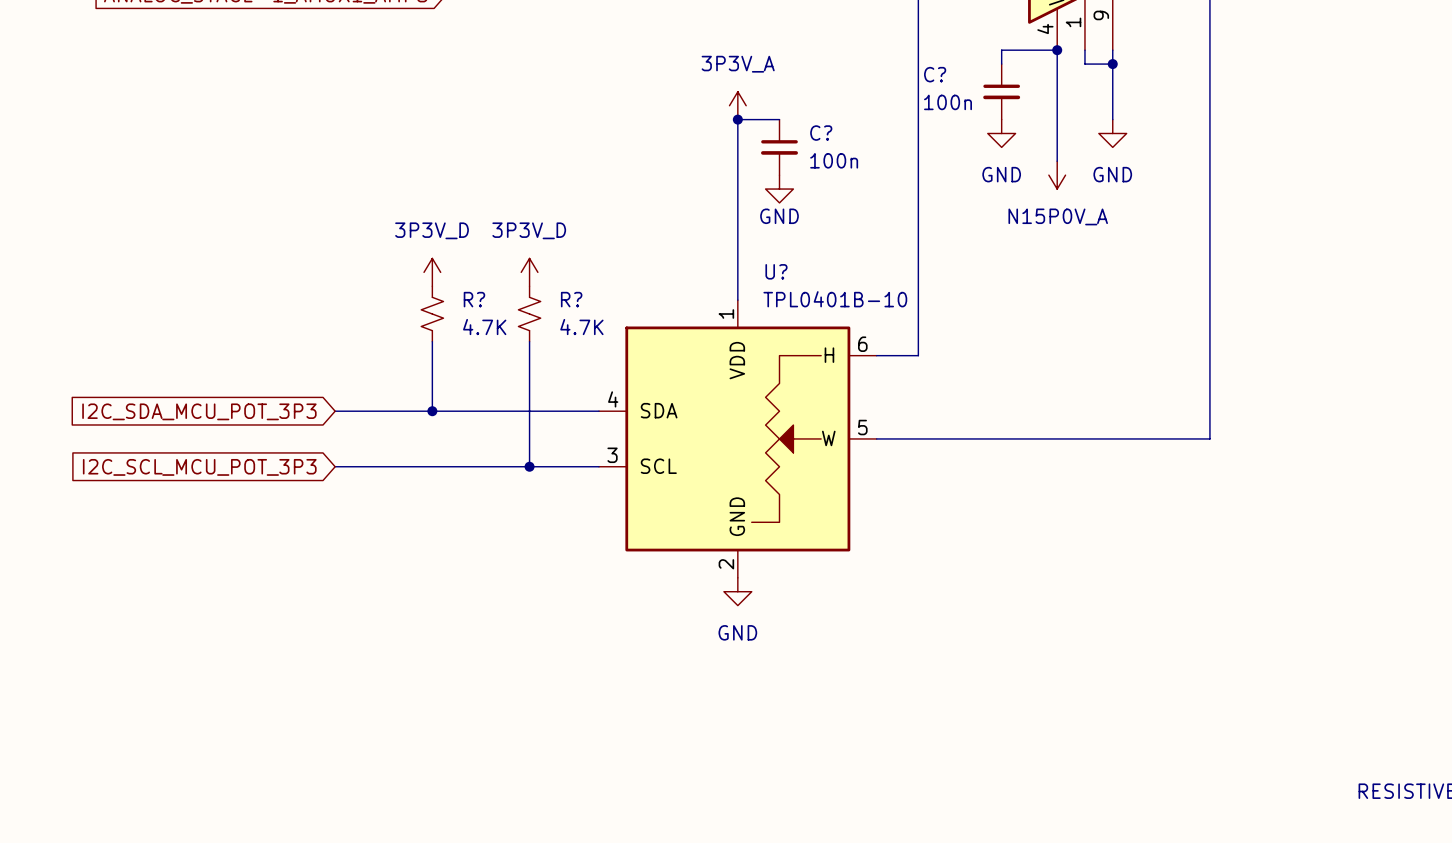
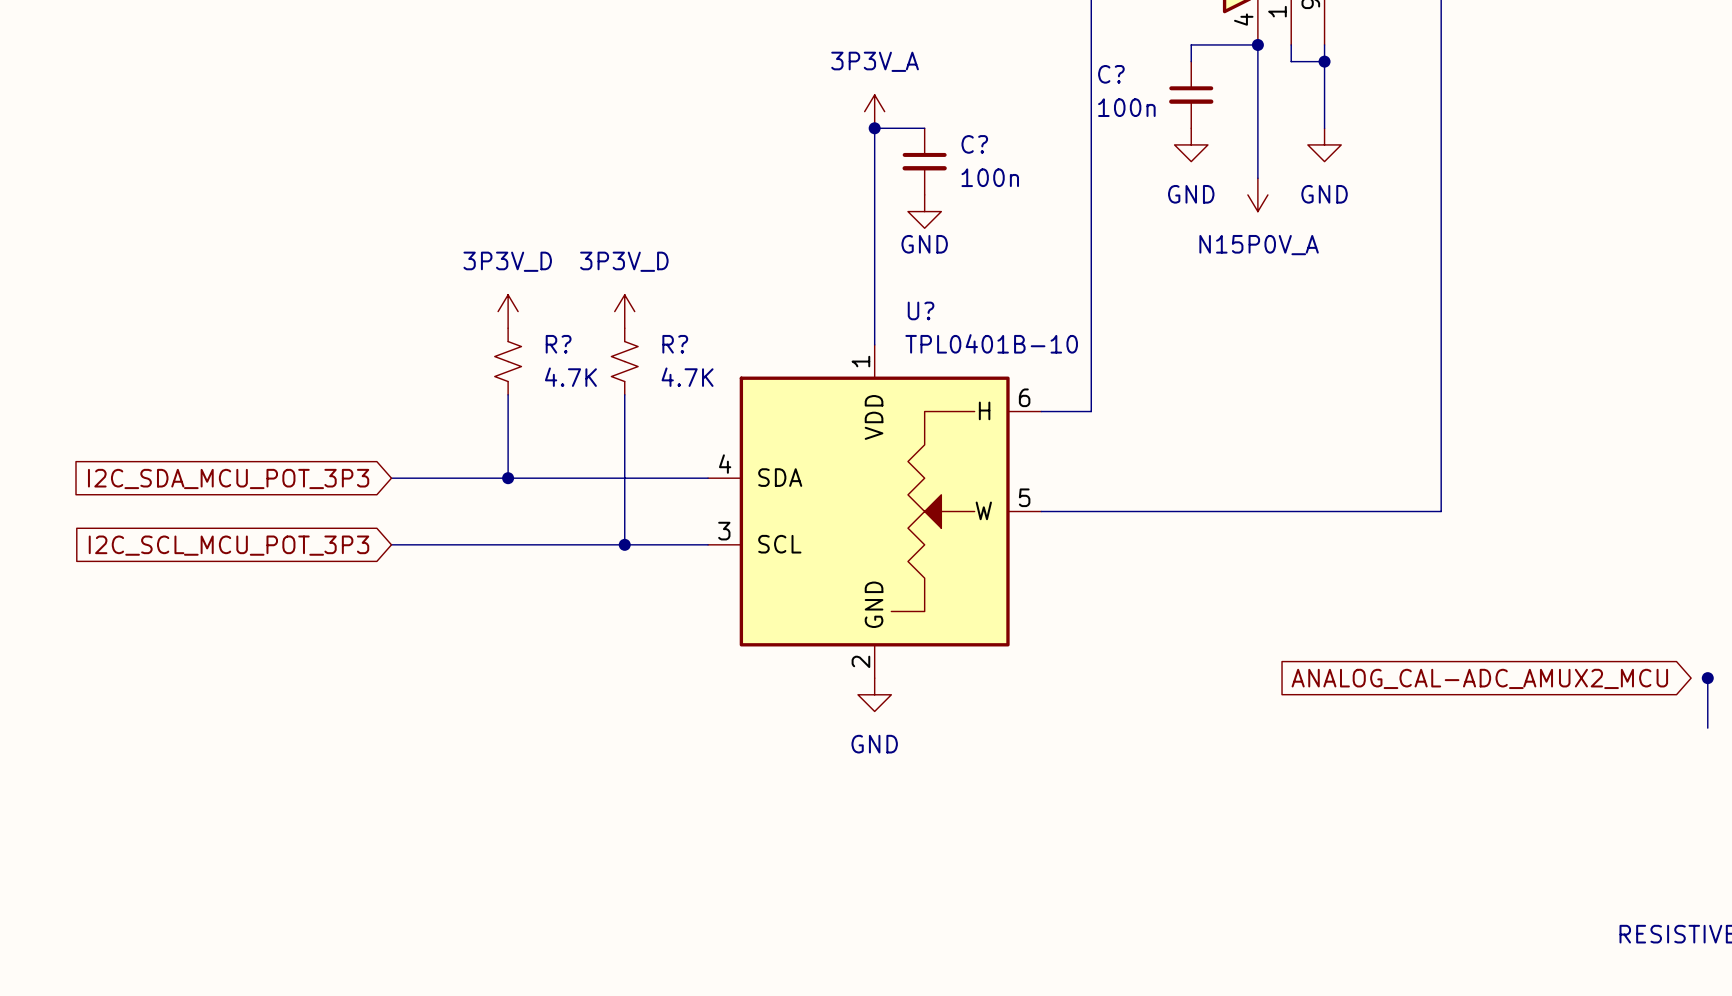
wire: none -> (1707, 678) (1707, 728)
junction: none -> (1707, 678)
global label: none -> ANALOG_CAL-ADC_AMUX2_MCU (1479, 678)

